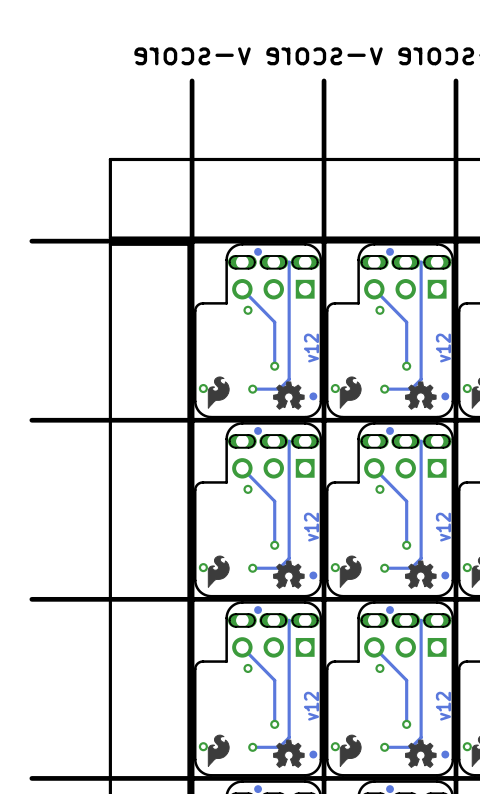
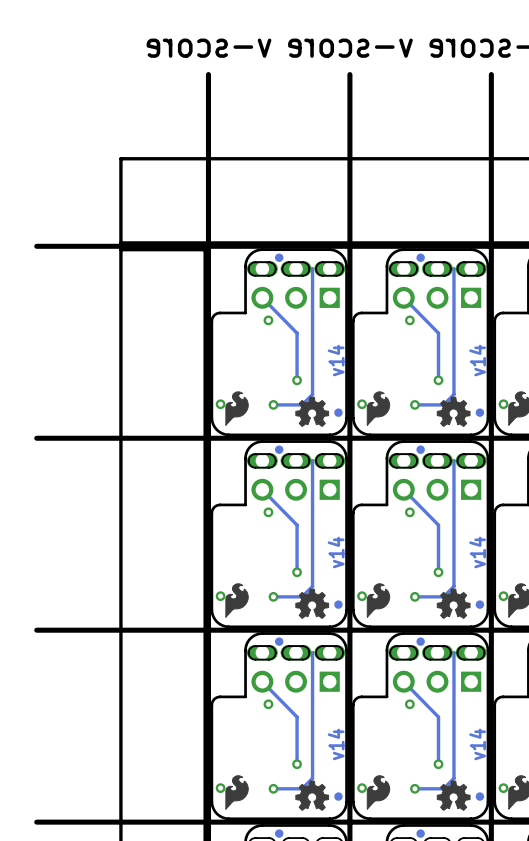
text: v12 (311, 348) -> v14 (336, 360)
text: v12 (443, 348) -> v14 (477, 360)
text: v12 (311, 527) -> v14 (336, 552)
text: v12 (443, 527) -> v14 (477, 552)
text: v12 (311, 706) -> v14 (336, 744)
text: v12 (443, 706) -> v14 (477, 744)

